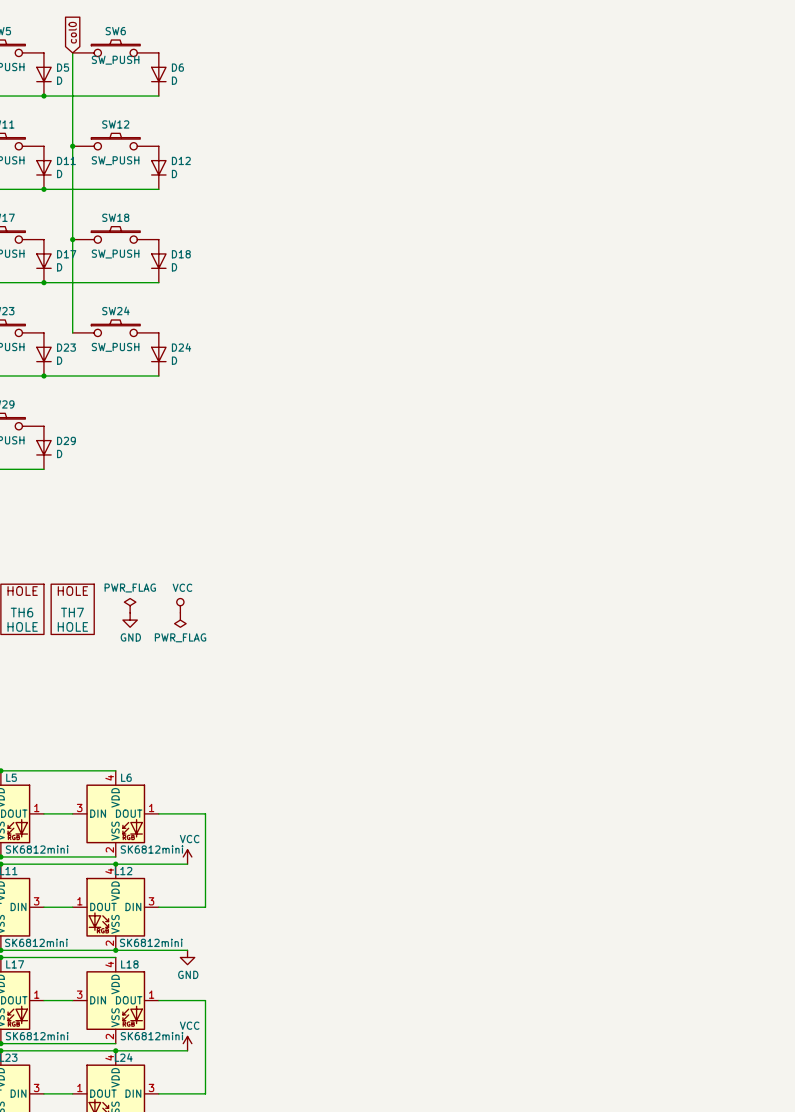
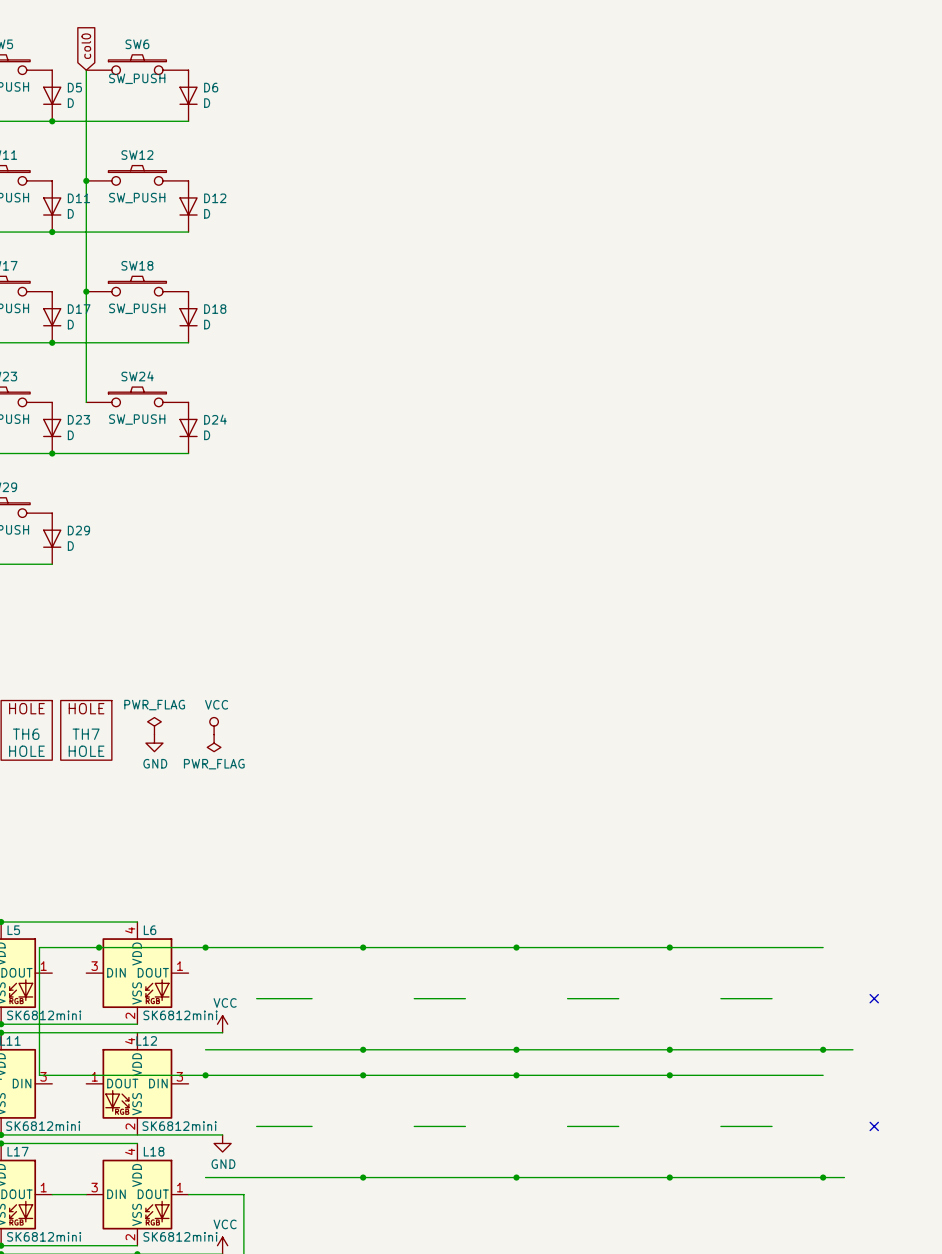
junction: none -> (99, 947)
junction: none -> (205, 947)
junction: none -> (363, 947)
junction: none -> (516, 947)
junction: none -> (669, 947)
wire: none -> (823, 947) (39, 947) (39, 1075) (823, 1075)
wire: (43, 813) (72, 813) -> none
wire: (158, 813) (205, 813) (205, 907) (158, 907) -> none
wire: none -> (256, 998) (312, 998)
wire: none -> (414, 998) (465, 998)
wire: none -> (567, 998) (618, 998)
wire: none -> (720, 998) (772, 998)
no-connect mark: none -> (874, 998)
junction: (115, 864) -> none
wire: none -> (205, 1049) (852, 1049)
junction: none -> (363, 1049)
junction: none -> (516, 1049)
junction: none -> (669, 1049)
junction: none -> (823, 1049)
junction: none -> (205, 1075)
junction: none -> (363, 1075)
junction: none -> (516, 1075)
junction: none -> (669, 1075)
wire: (43, 907) (72, 907) -> none
wire: none -> (256, 1126) (312, 1126)
wire: none -> (414, 1126) (465, 1126)
wire: none -> (567, 1126) (618, 1126)
wire: none -> (720, 1126) (772, 1126)
no-connect mark: none -> (874, 1126)
junction: (115, 950) -> none
wire: none -> (205, 1177) (844, 1177)
junction: none -> (363, 1177)
junction: none -> (516, 1177)
junction: none -> (669, 1177)
junction: none -> (823, 1177)

